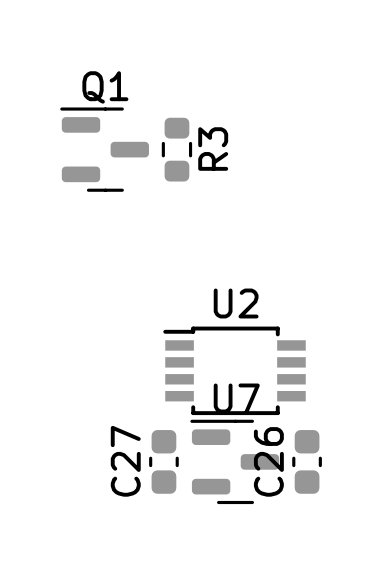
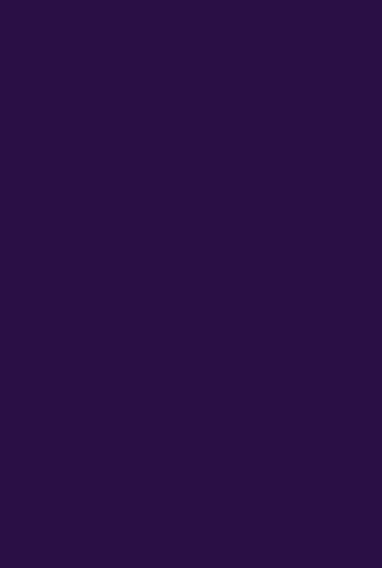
Q1: (104, 149) -> none
R3: (176, 149) -> none
U2: (234, 370) -> none
C27: (163, 461) -> none
U7: (234, 461) -> none
C26: (307, 461) -> none

